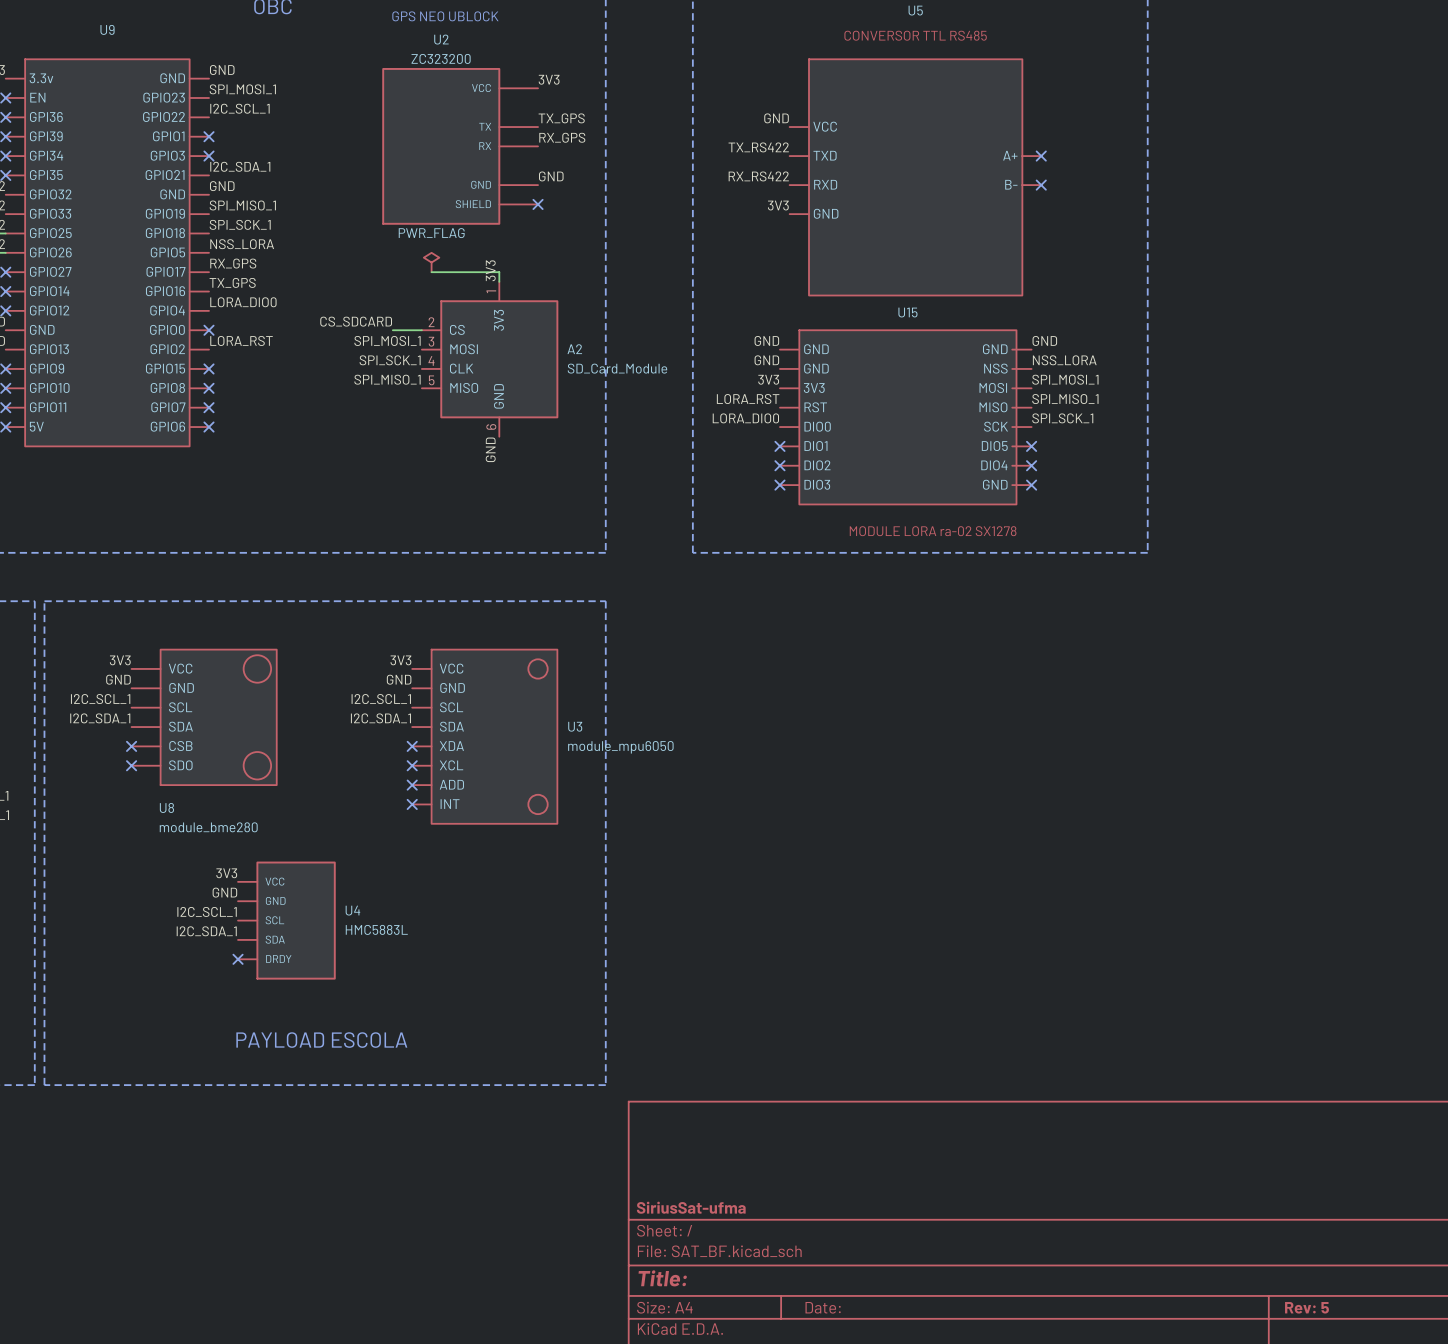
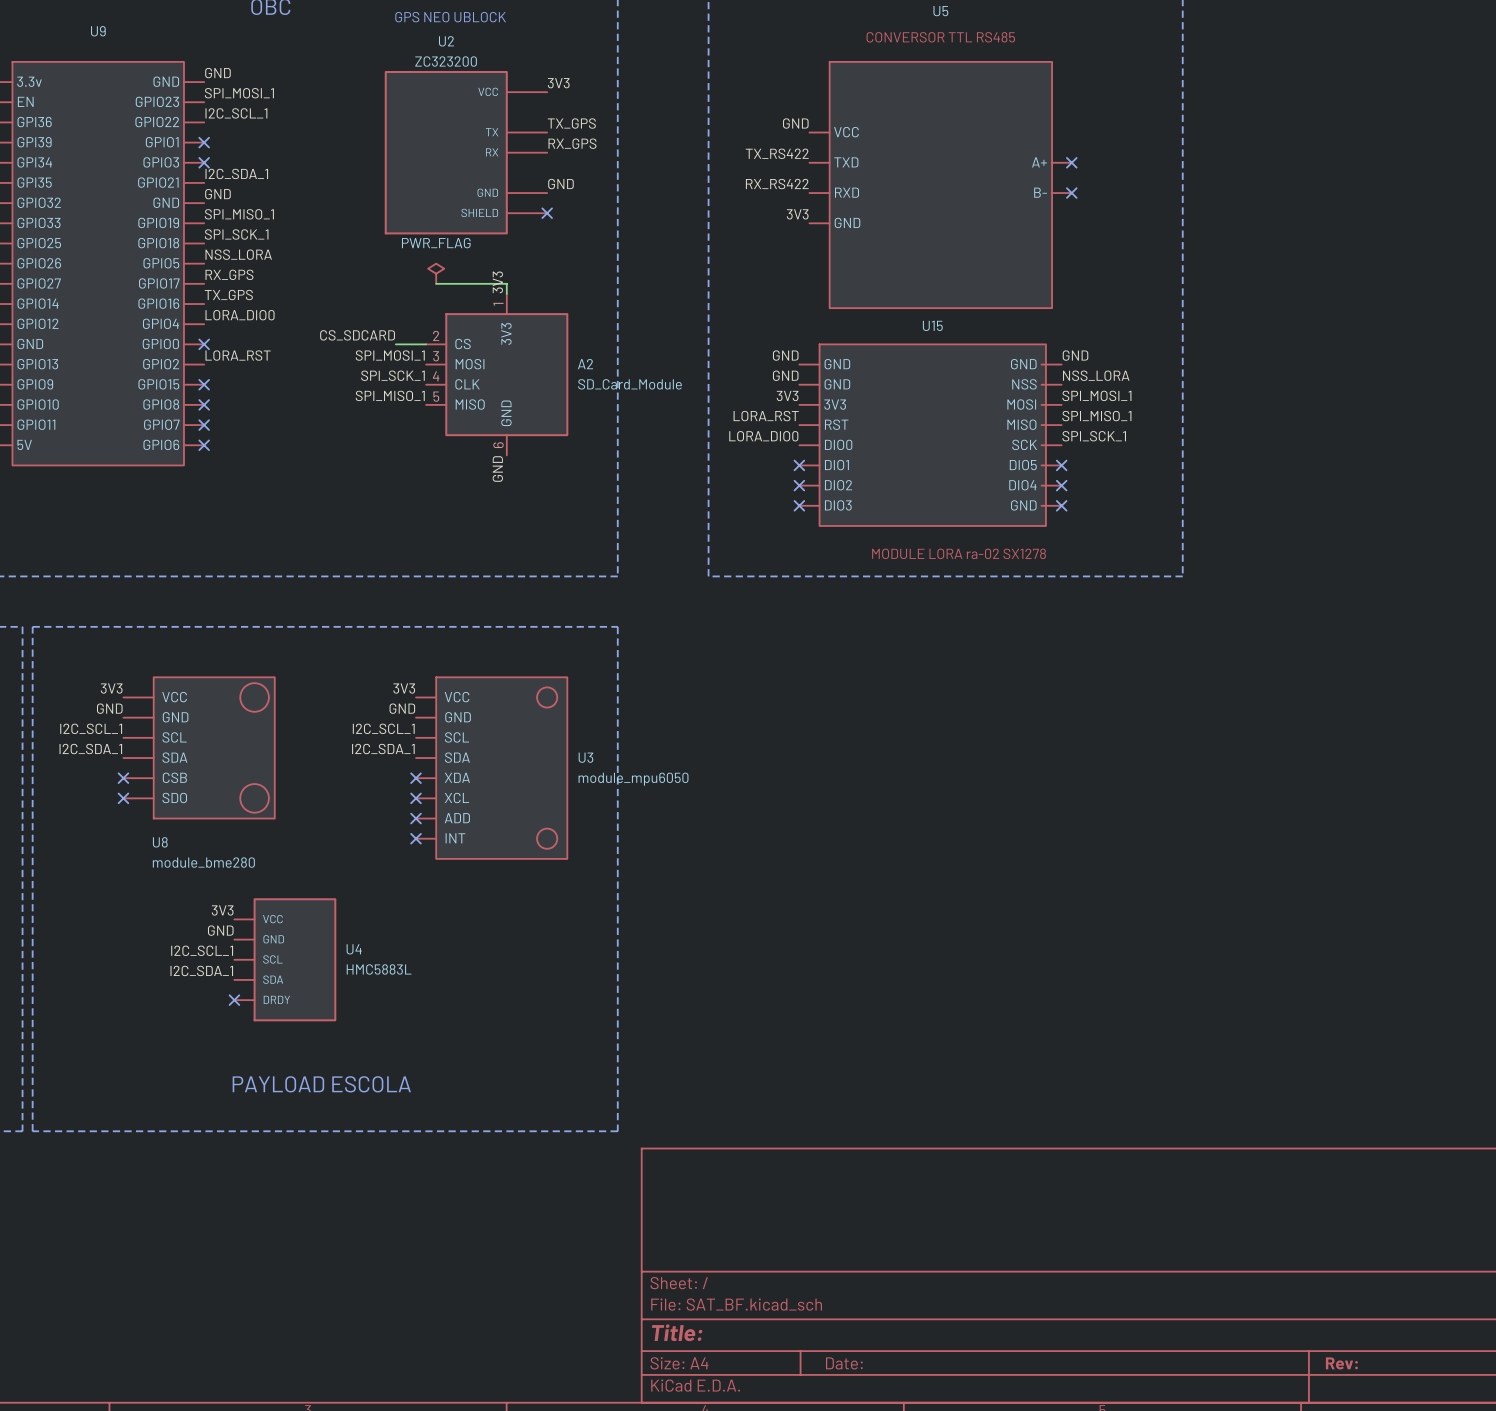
title block: SiriusSat-ufma (691, 1207) -> none
title block: Rev: 5 (1306, 1307) -> Rev: (1341, 1363)

